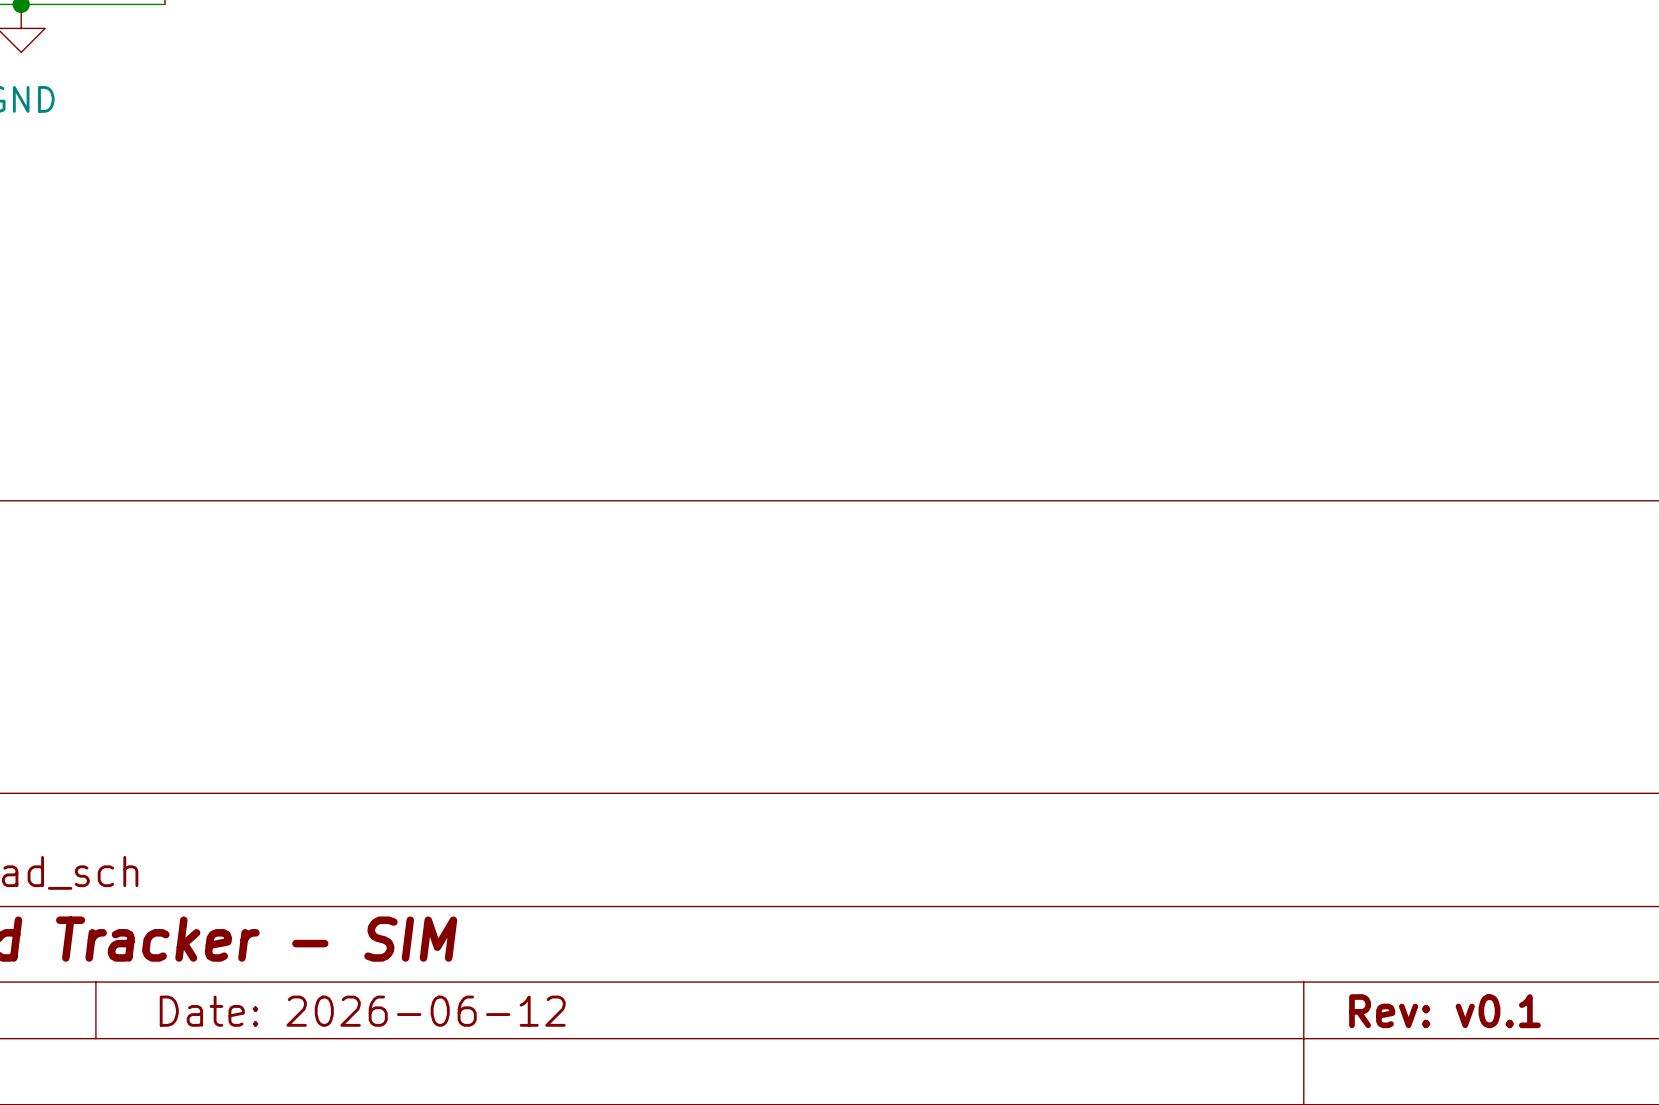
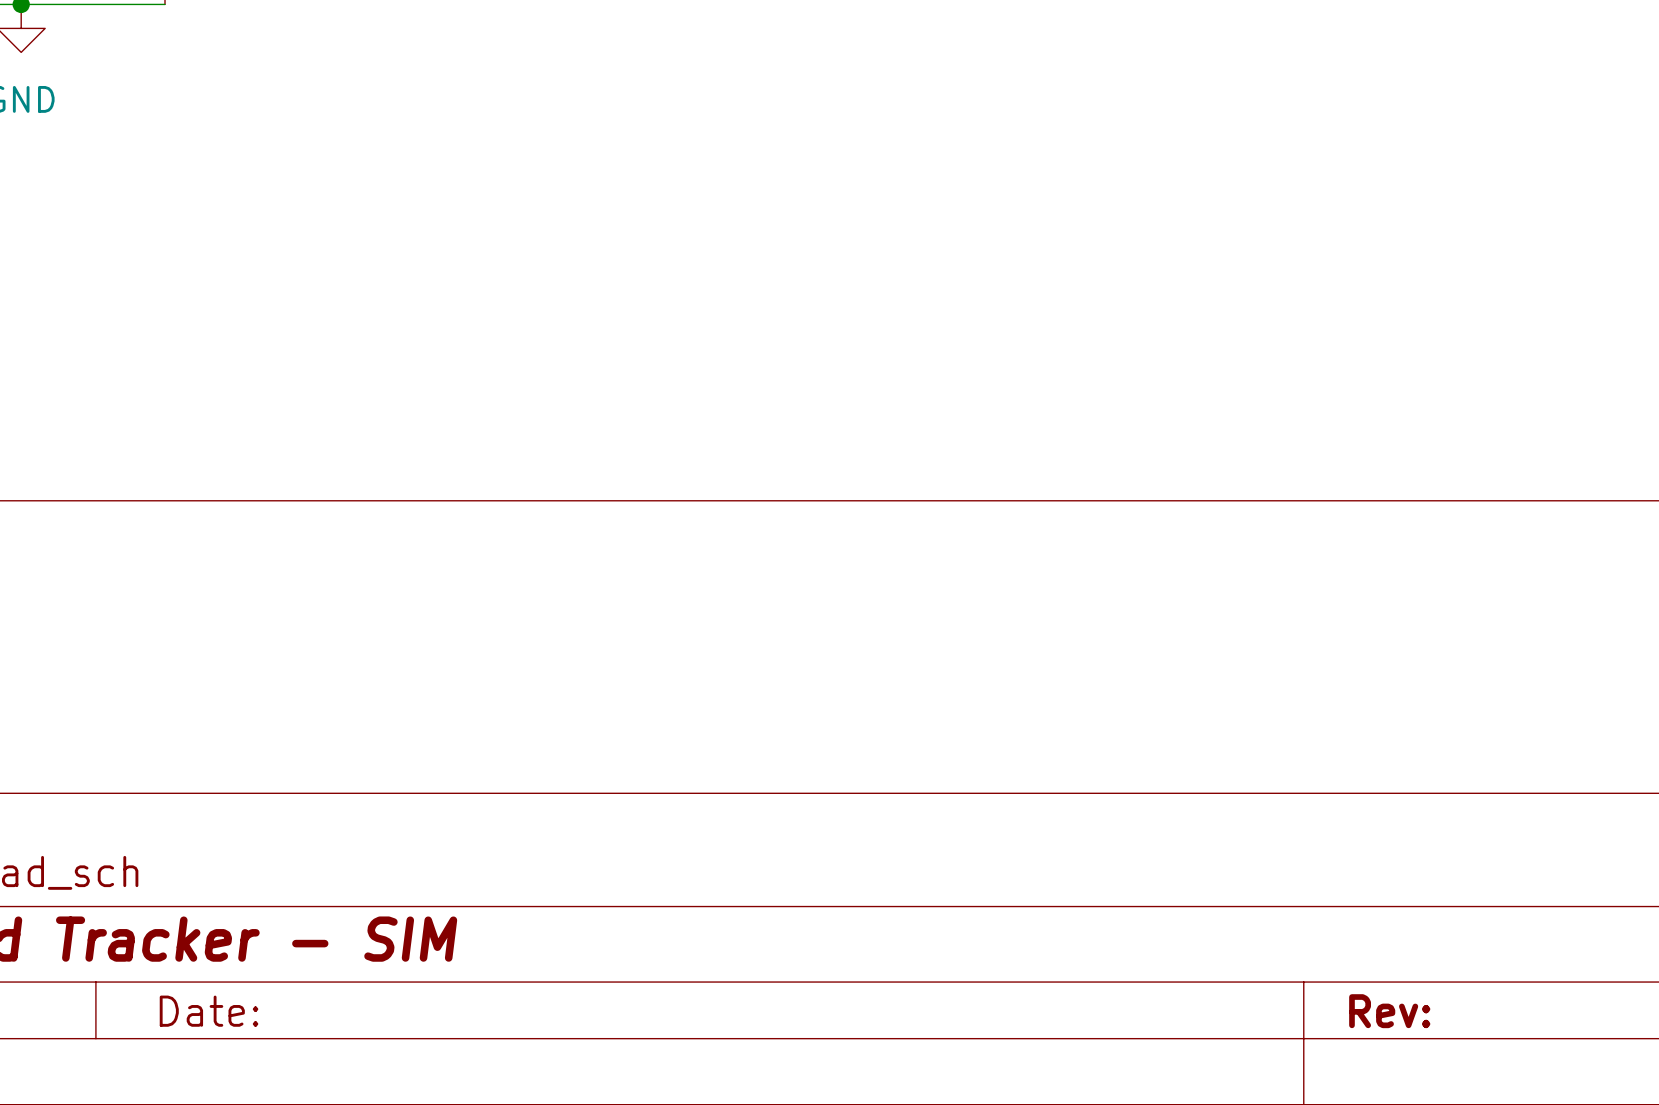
title block: Date: 2026-06-12 (362, 1011) -> Date: (209, 1011)
title block: Rev: v0.1 (1445, 1011) -> Rev: (1389, 1011)

